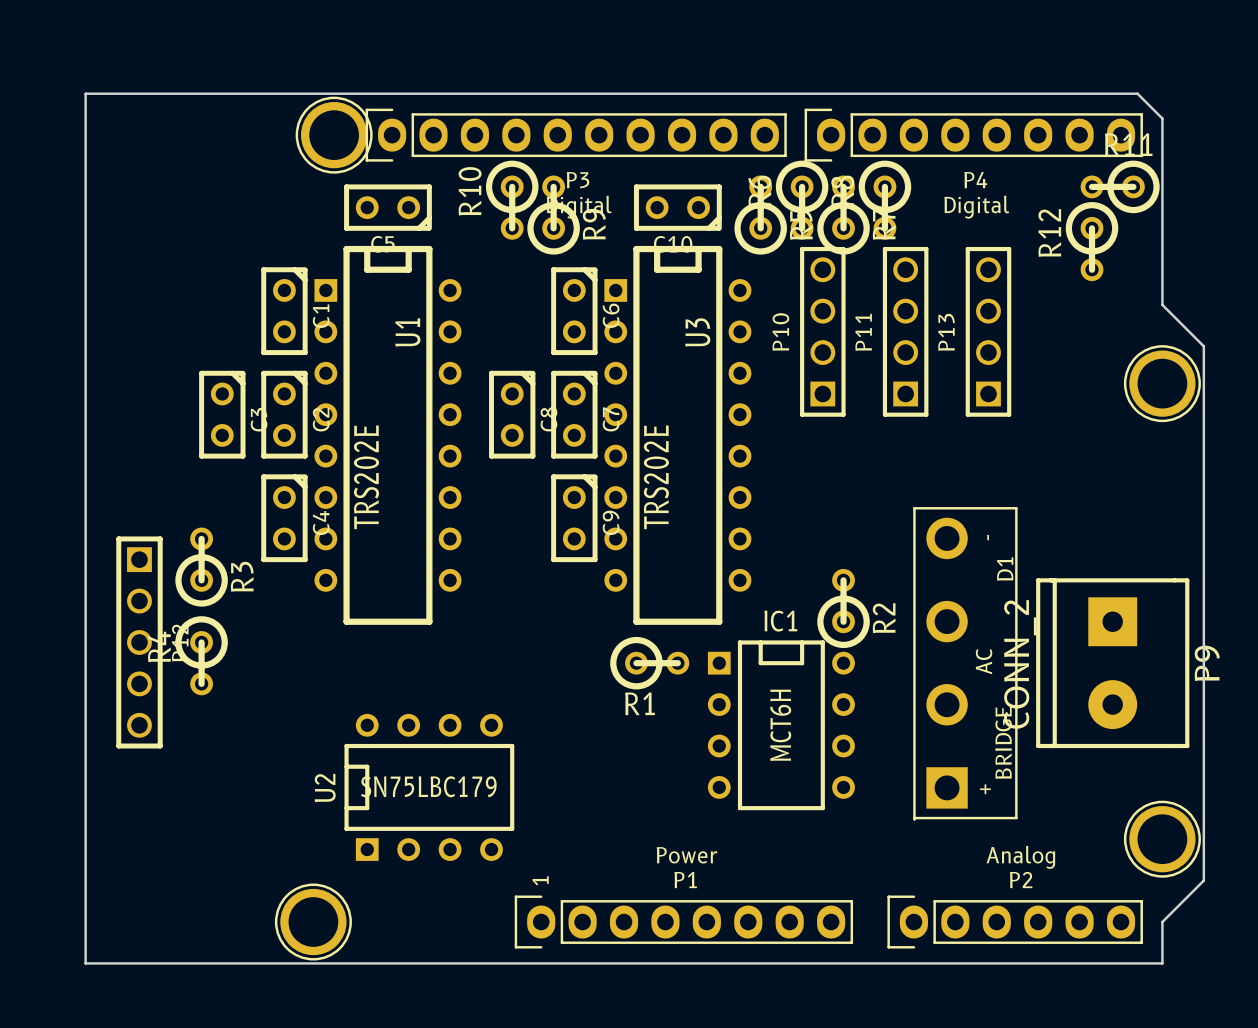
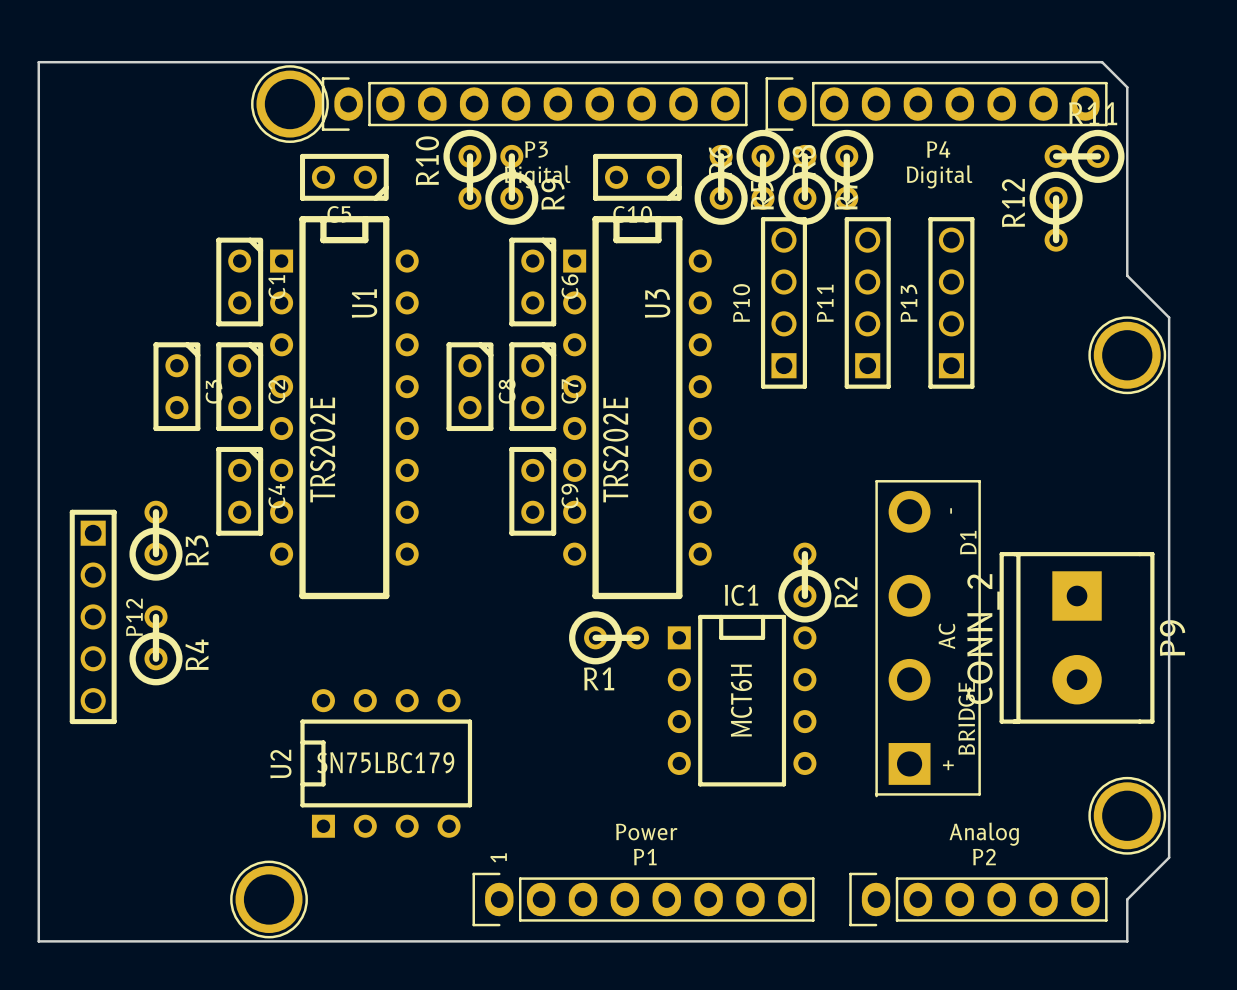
R4 rotation: 0° (201, 655) -> 180° (155, 645)

